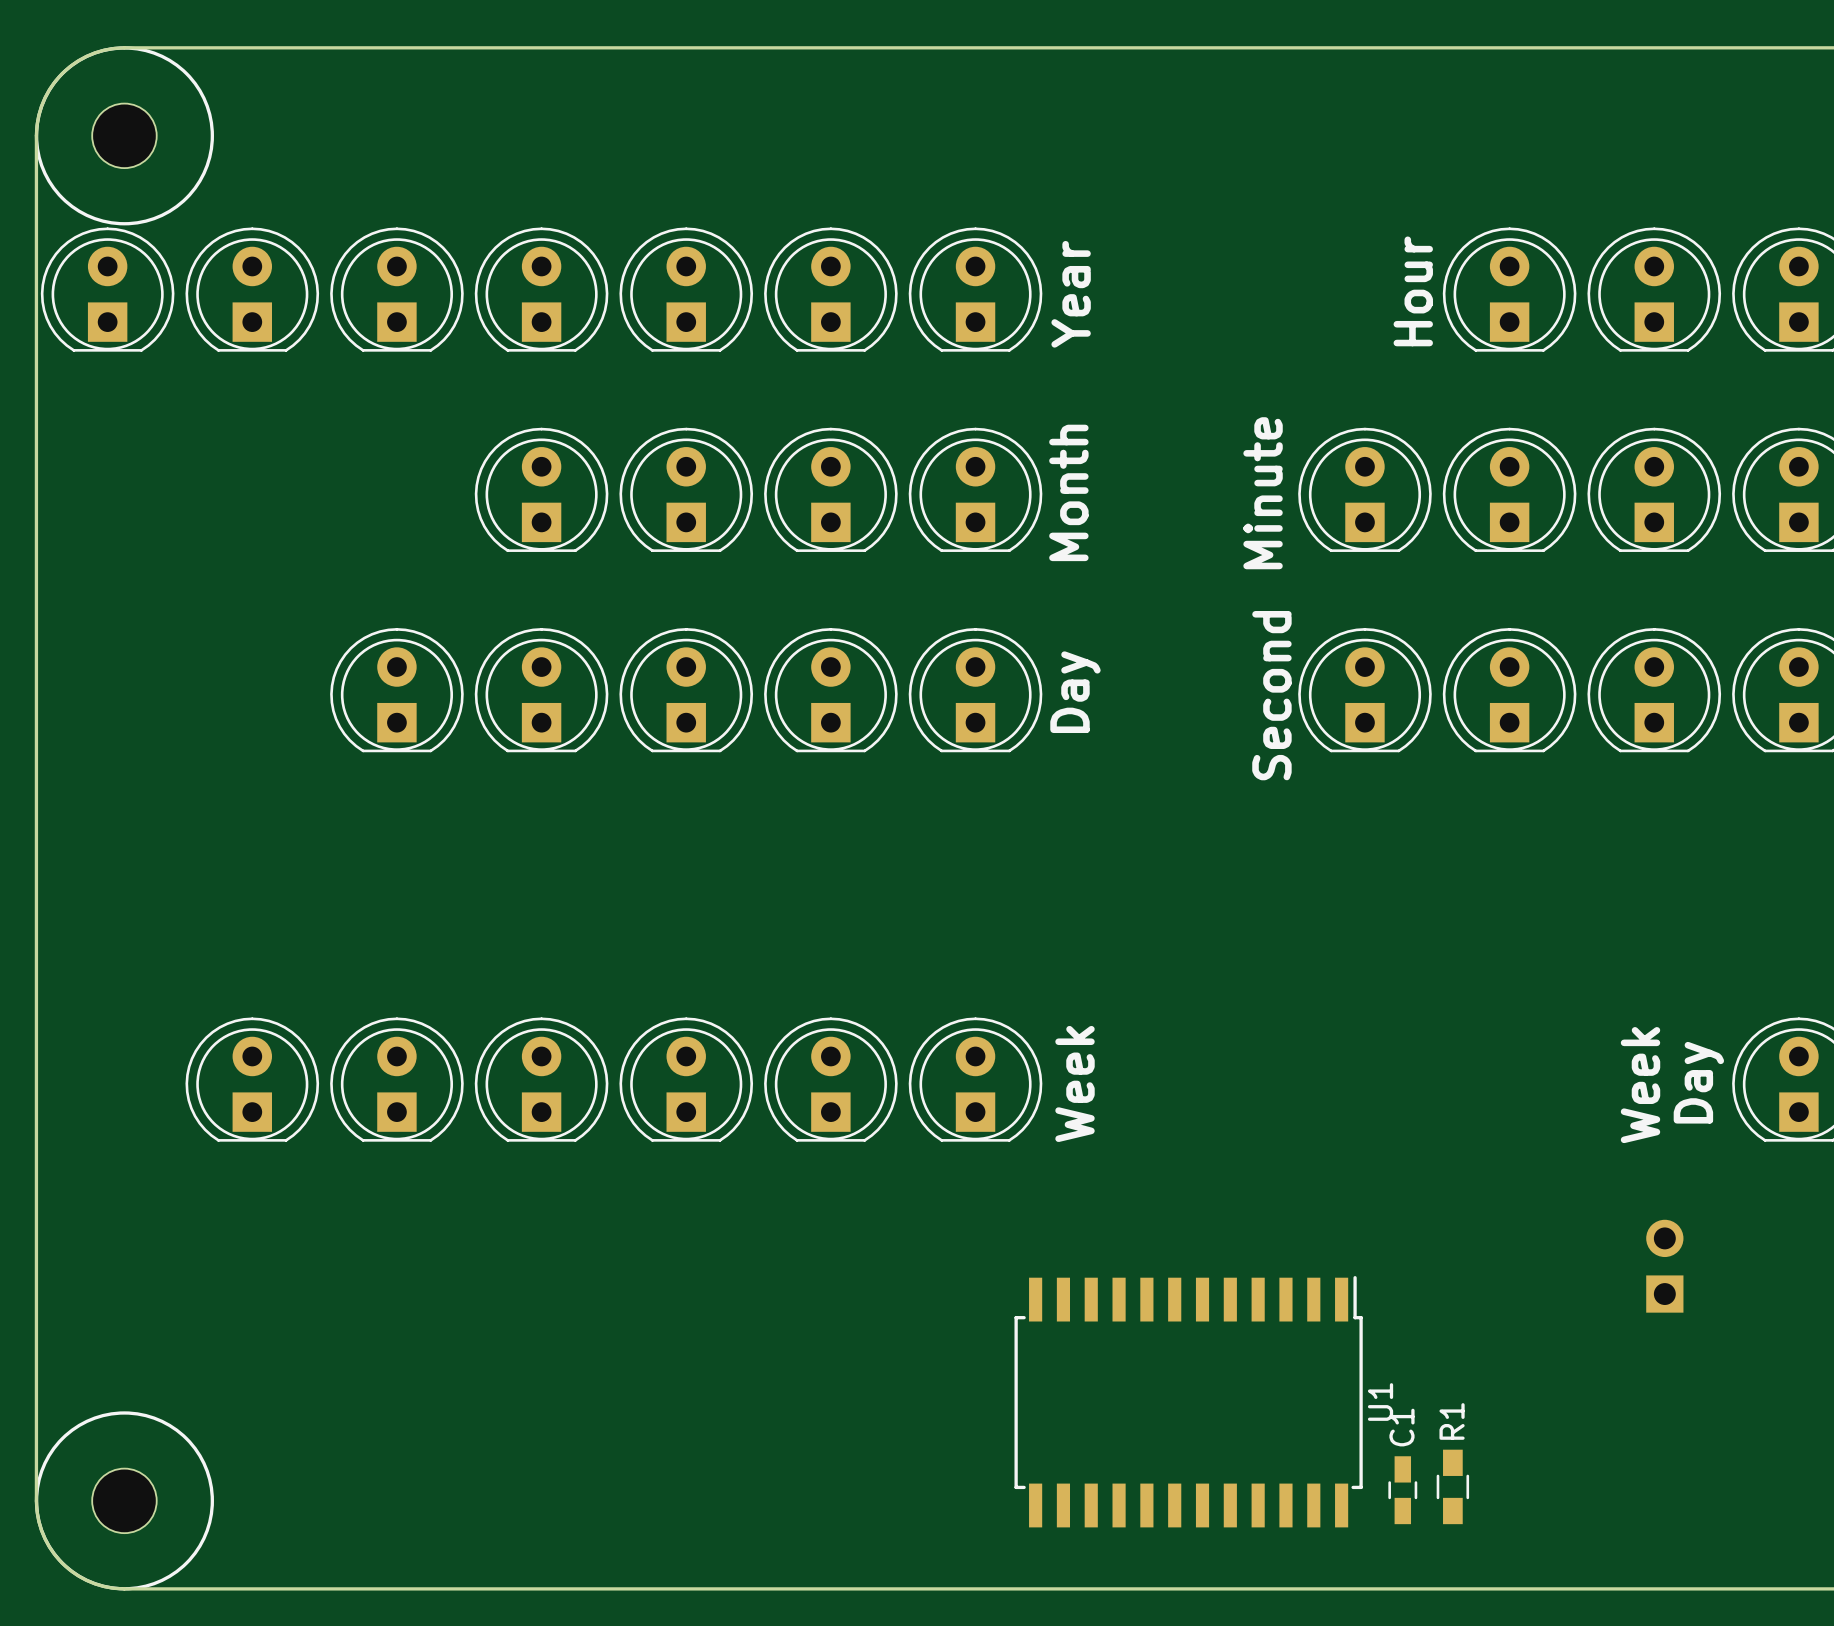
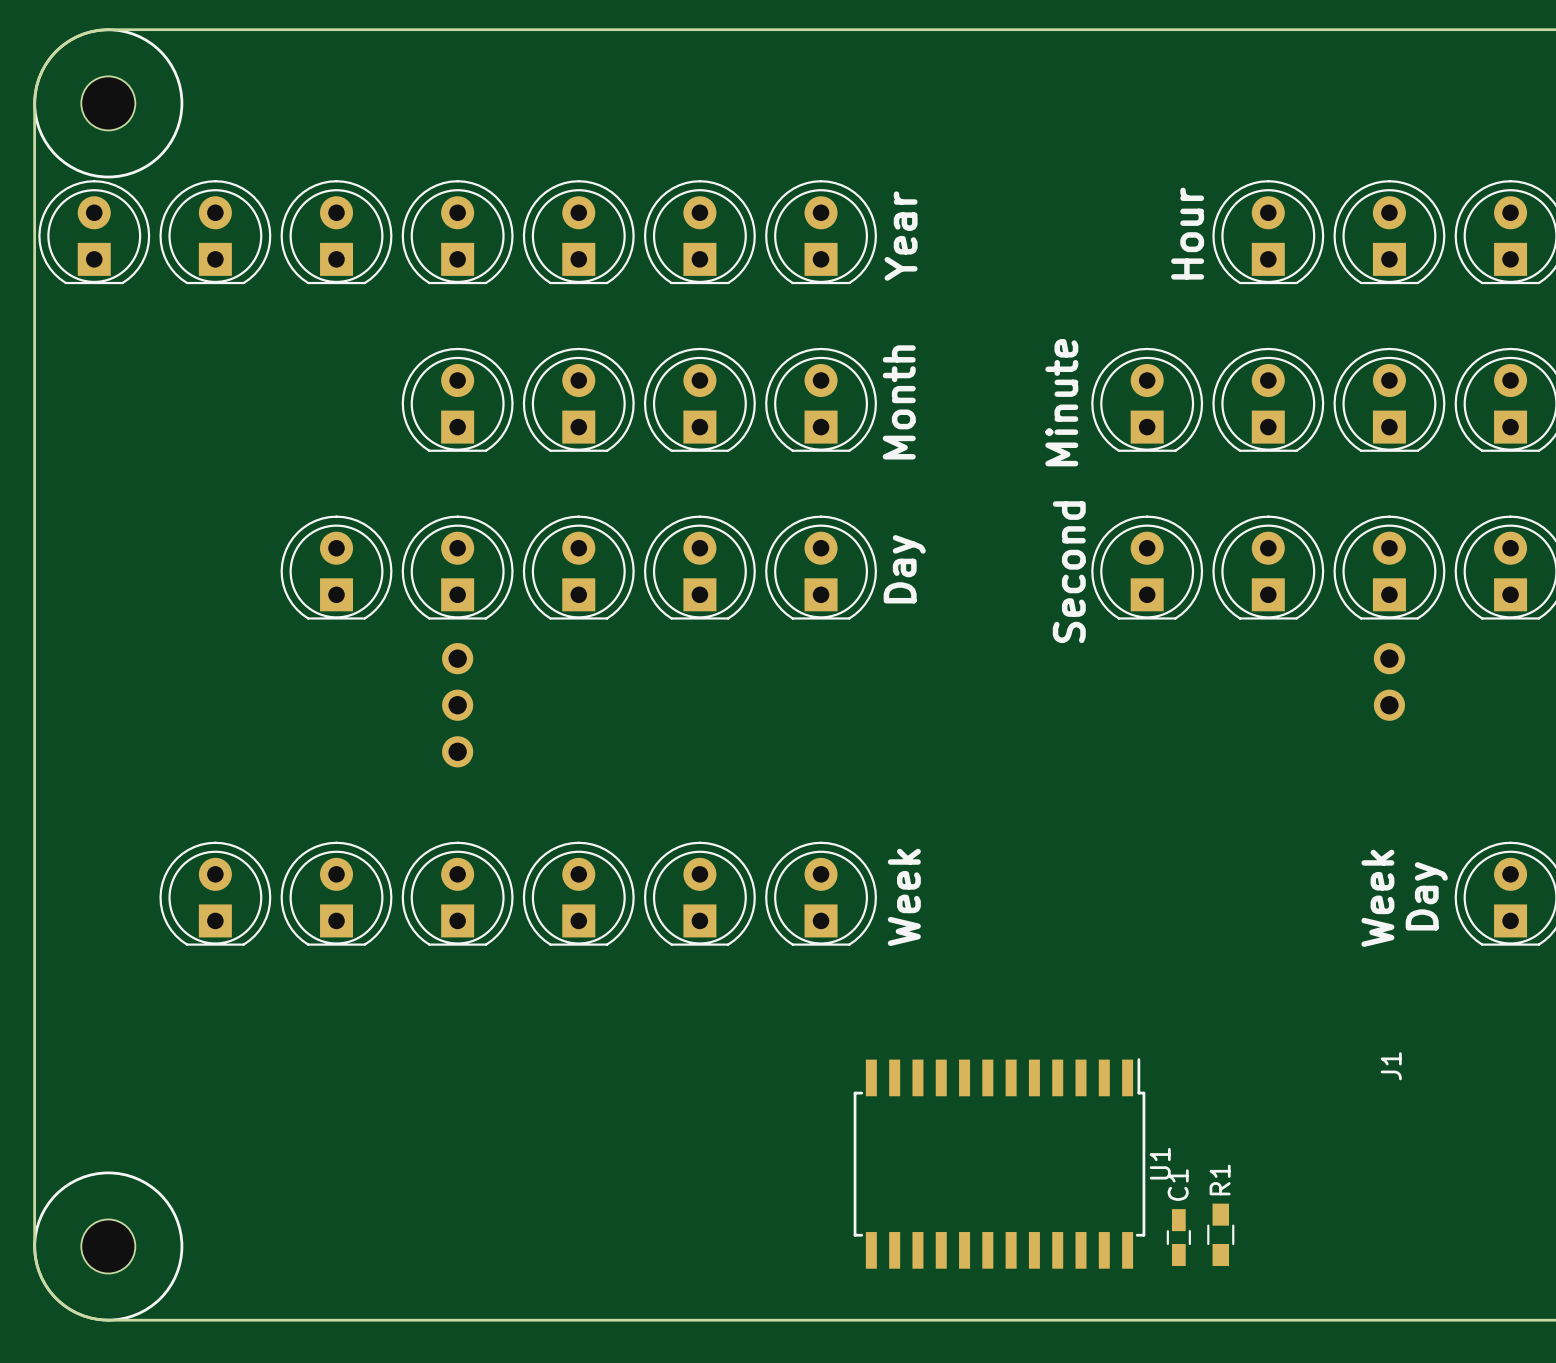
J1: none -> (923, 705)
part: (1664, 1266) -> none

